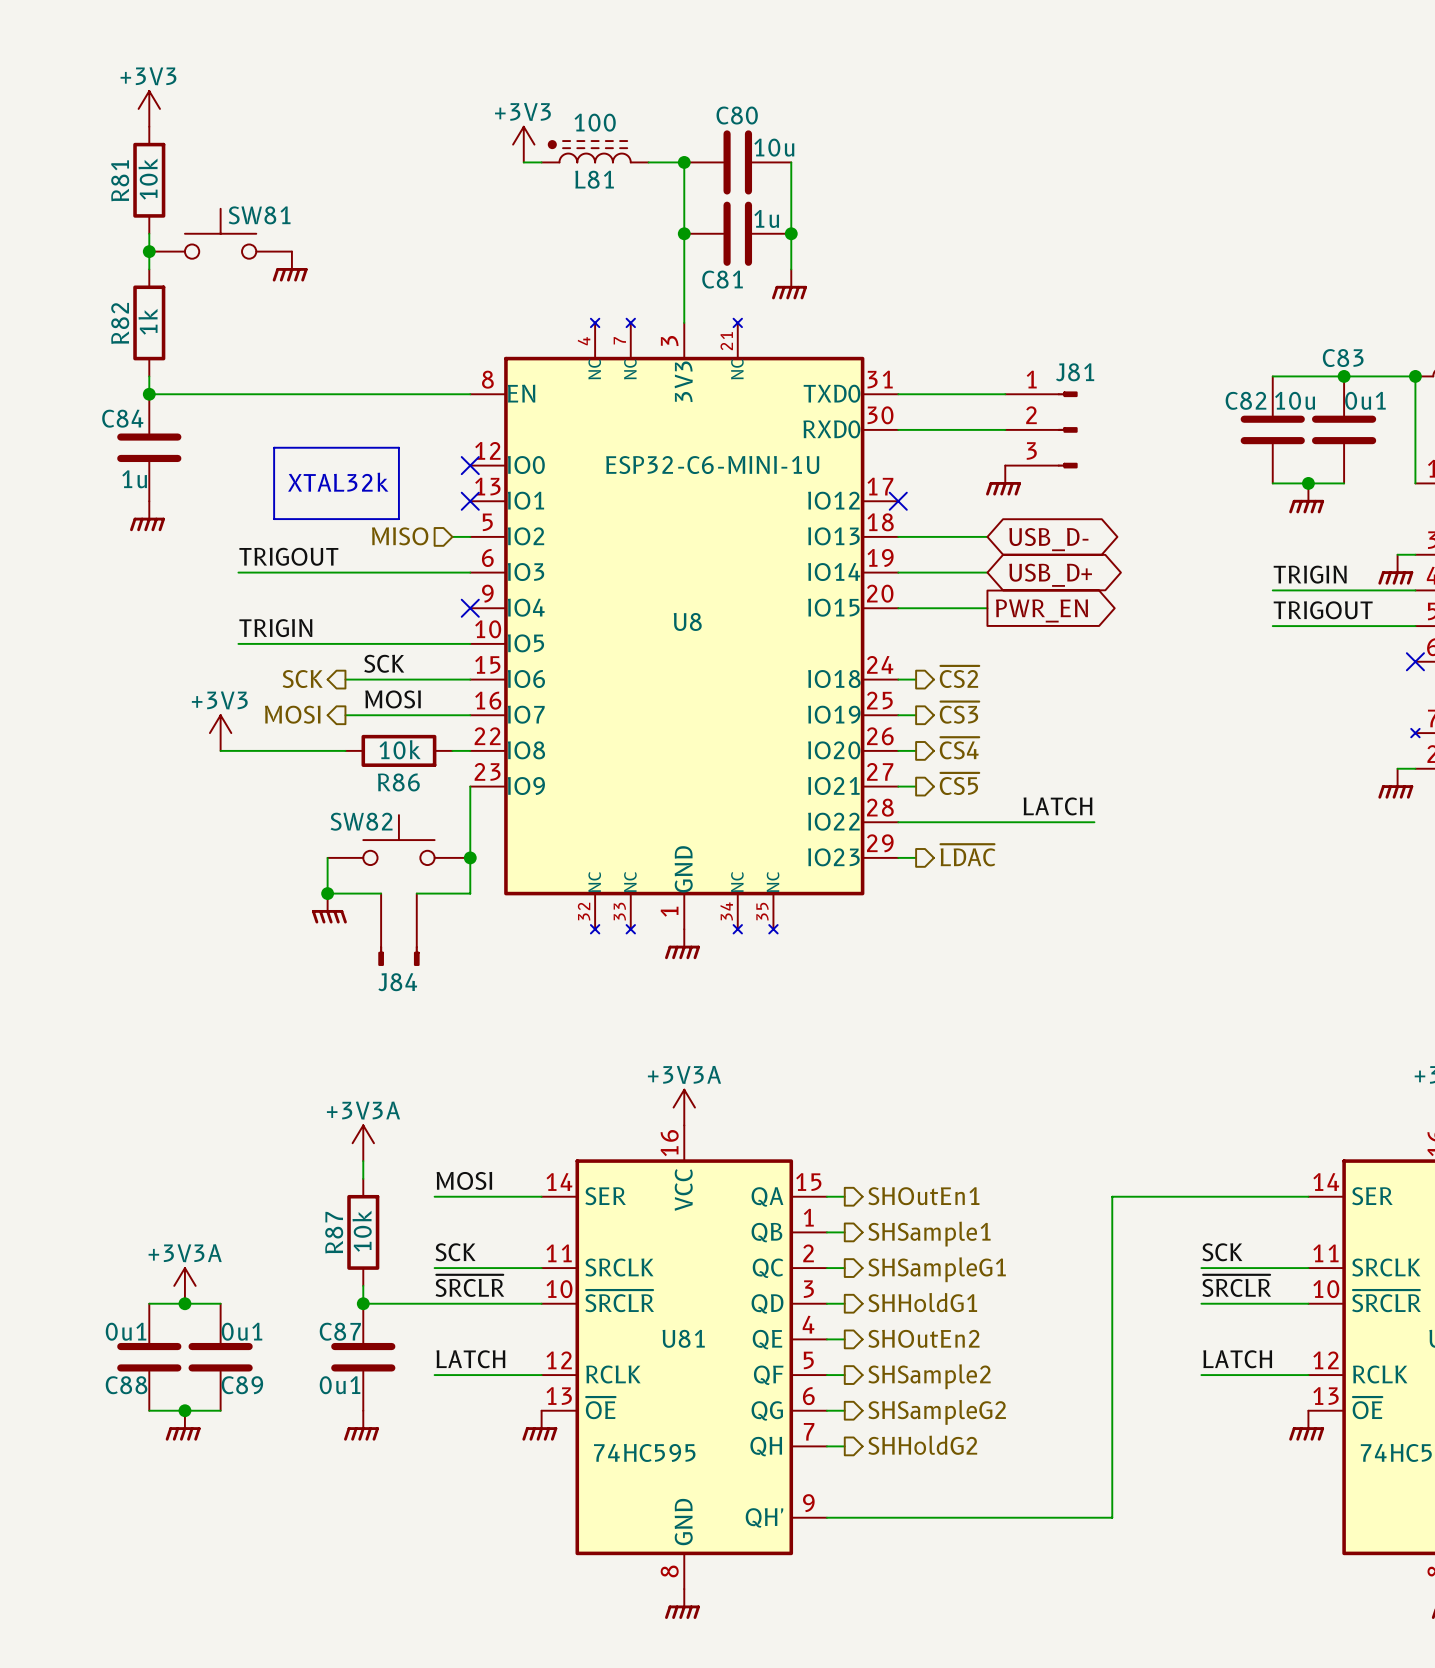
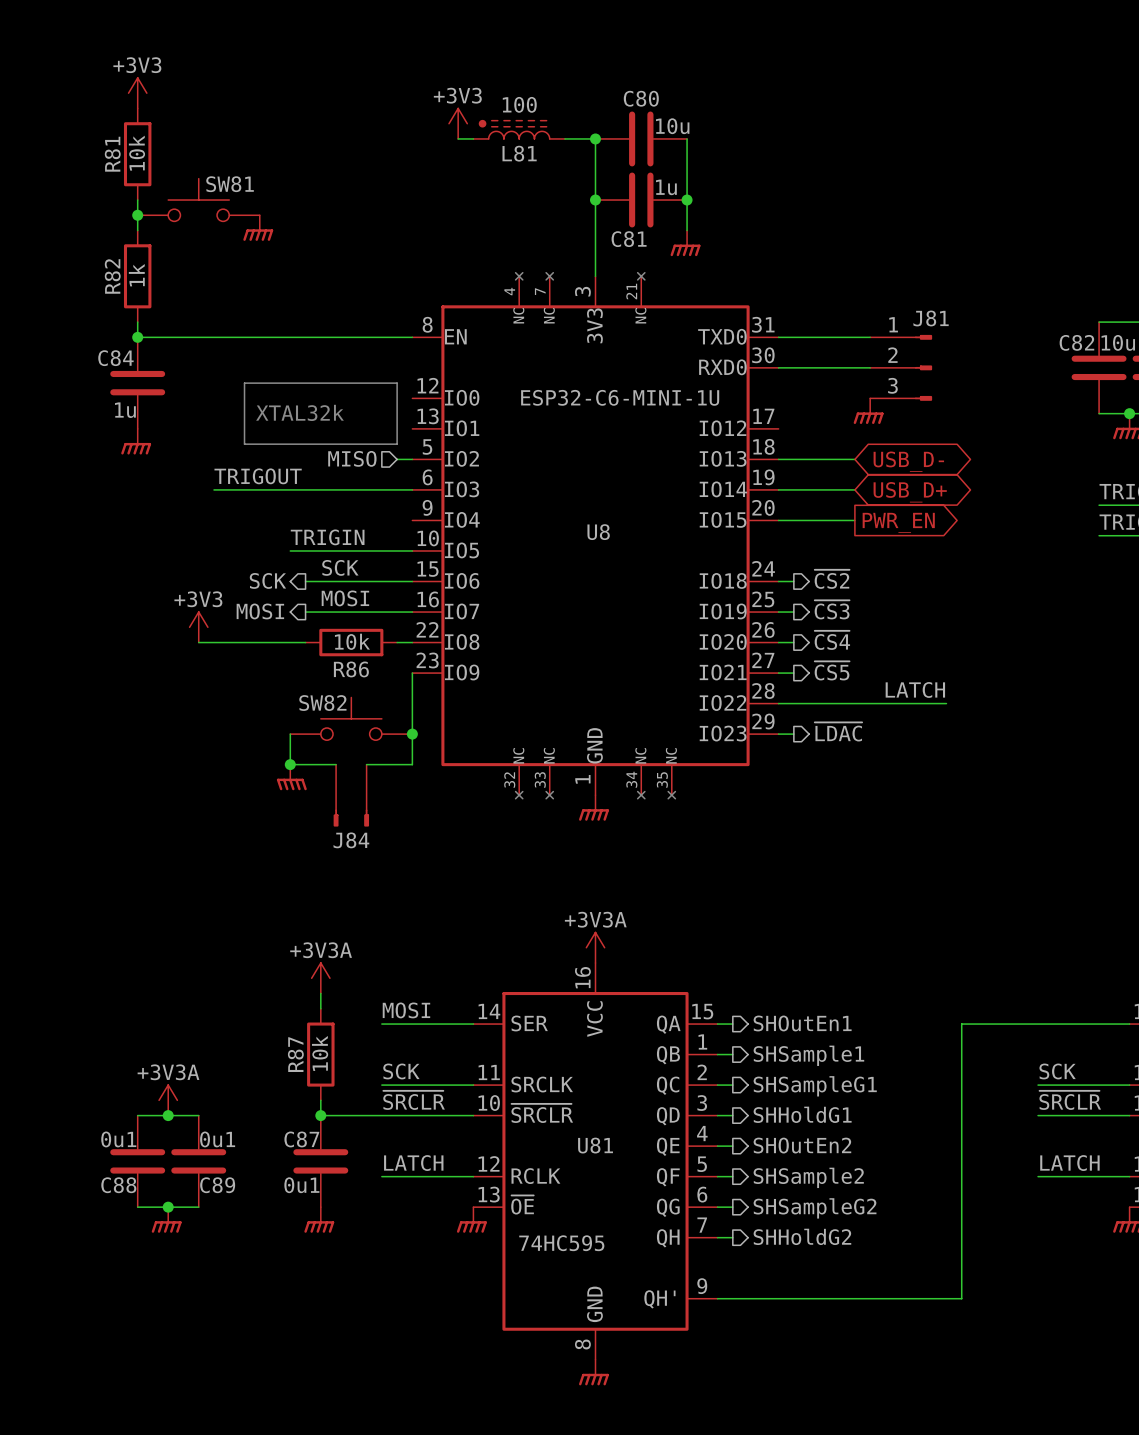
line: (398, 447) (398, 519) -> (351, 383) (397, 383) (397, 444) (351, 444)
no-connect mark: (470, 465) -> none
no-connect mark: (470, 501) -> none
no-connect mark: (898, 501) -> none
no-connect mark: (470, 608) -> none
label position: TRIGIN (275, 628) -> TRIGIN (327, 537)
wire: (238, 643) (327, 643) -> none

